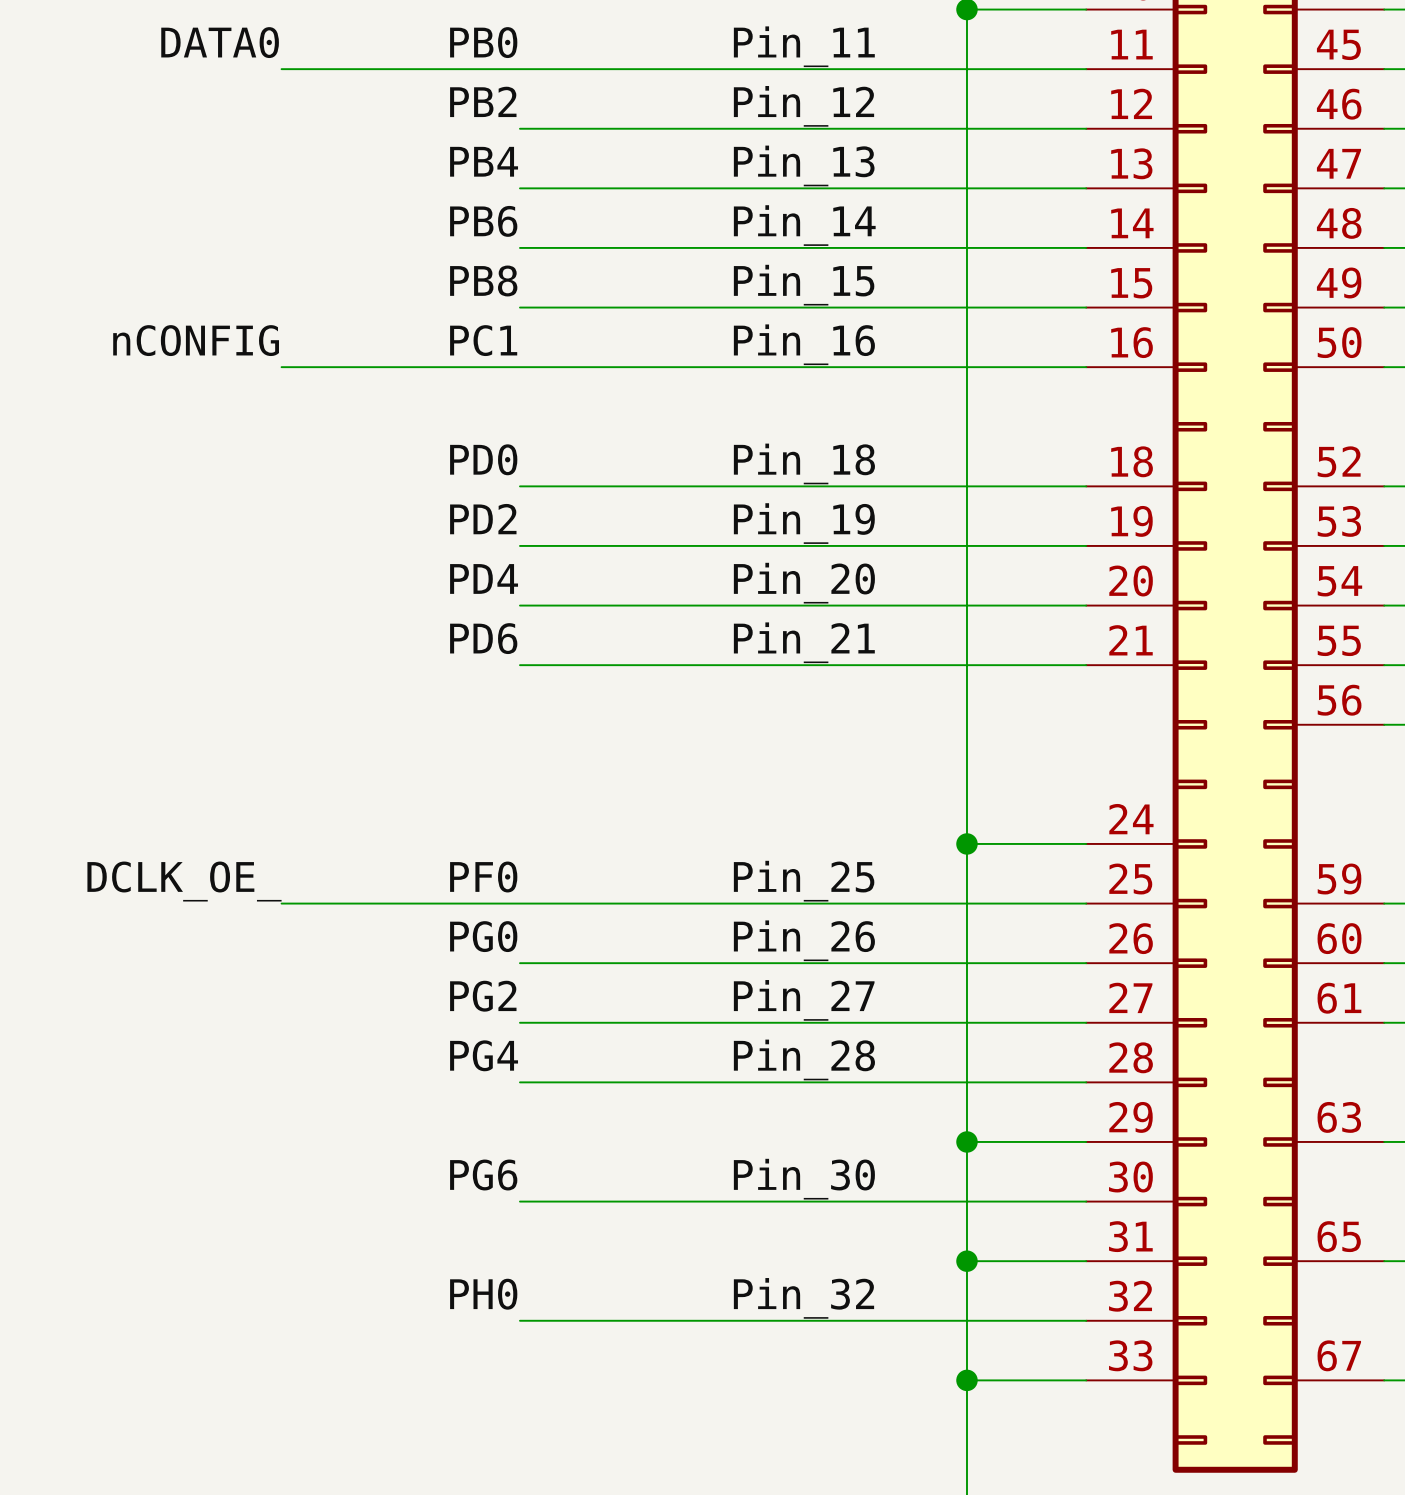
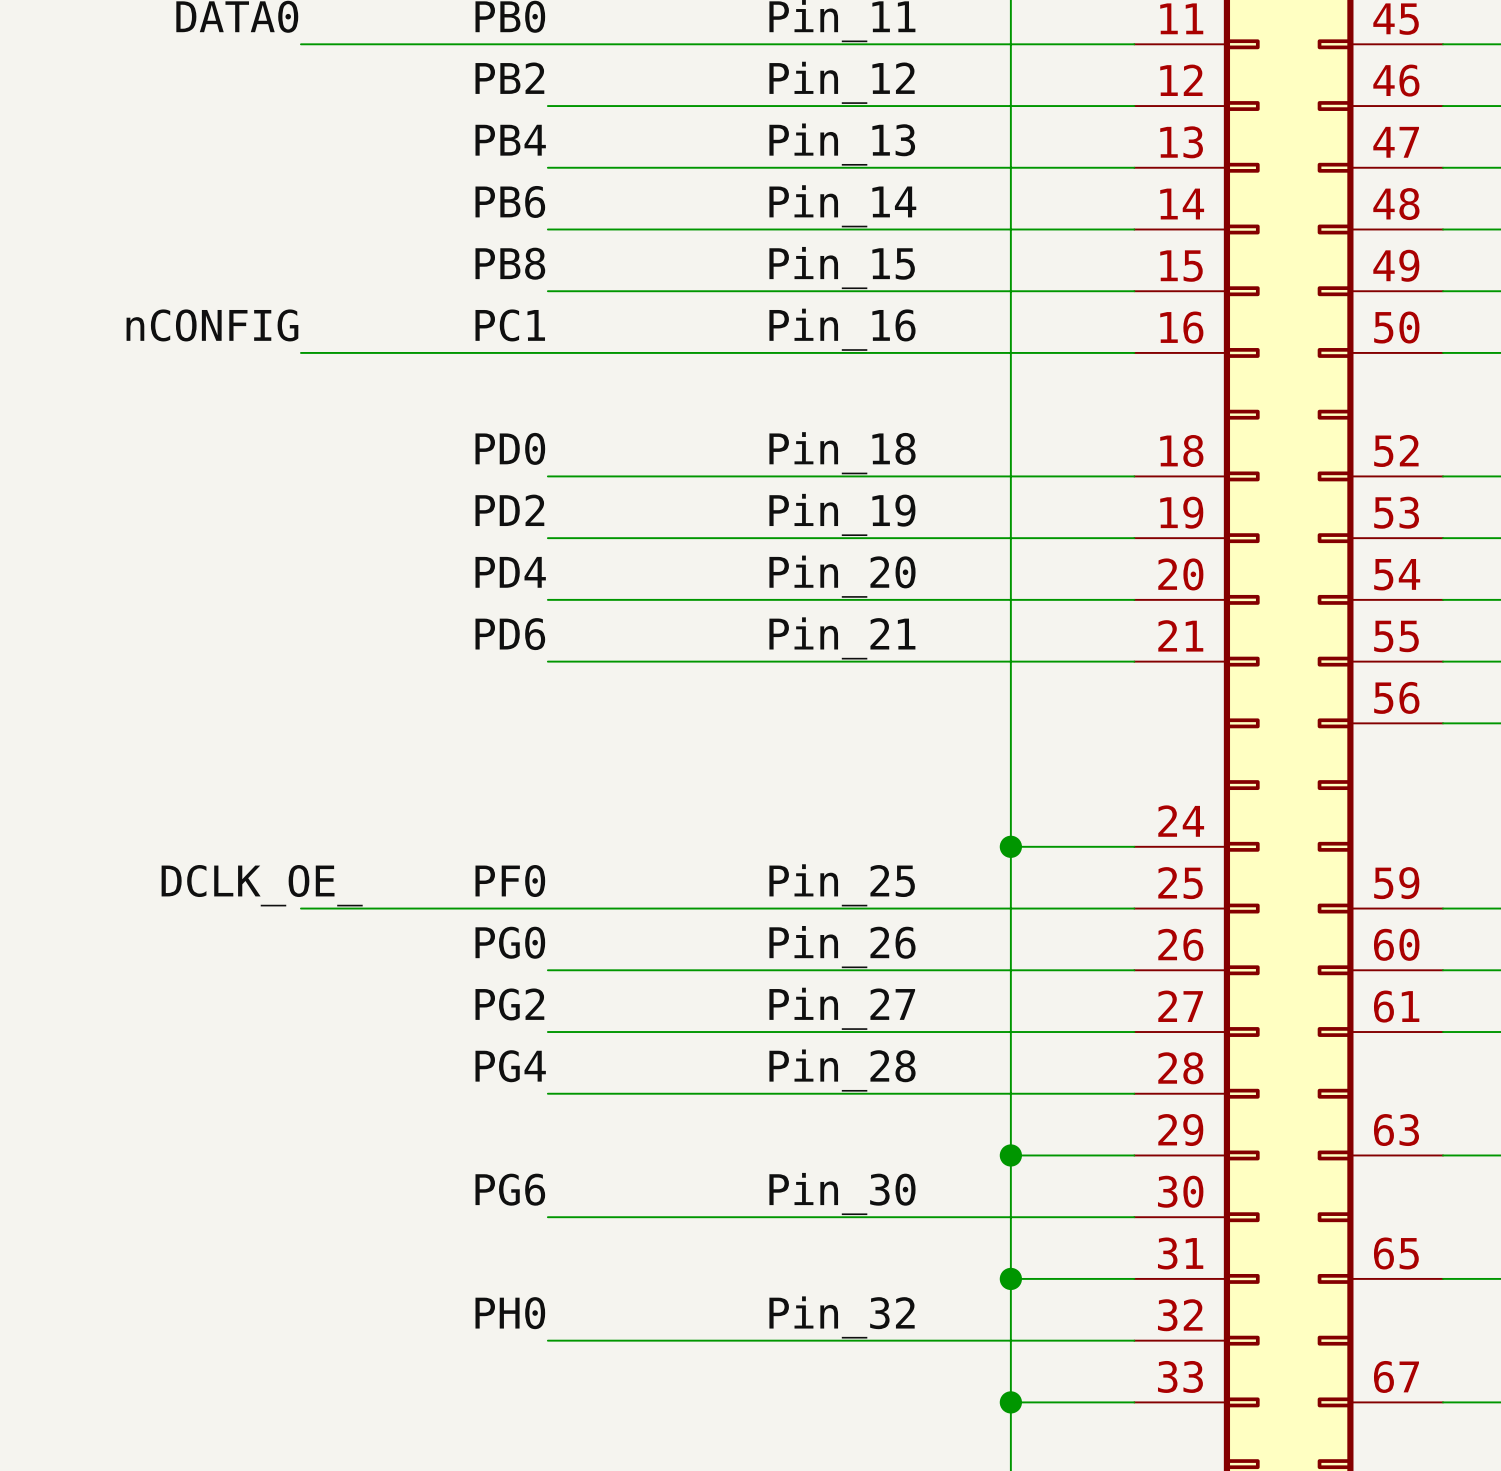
label position: DCLK_OE_ (184, 881) -> DCLK_OE_ (262, 885)

